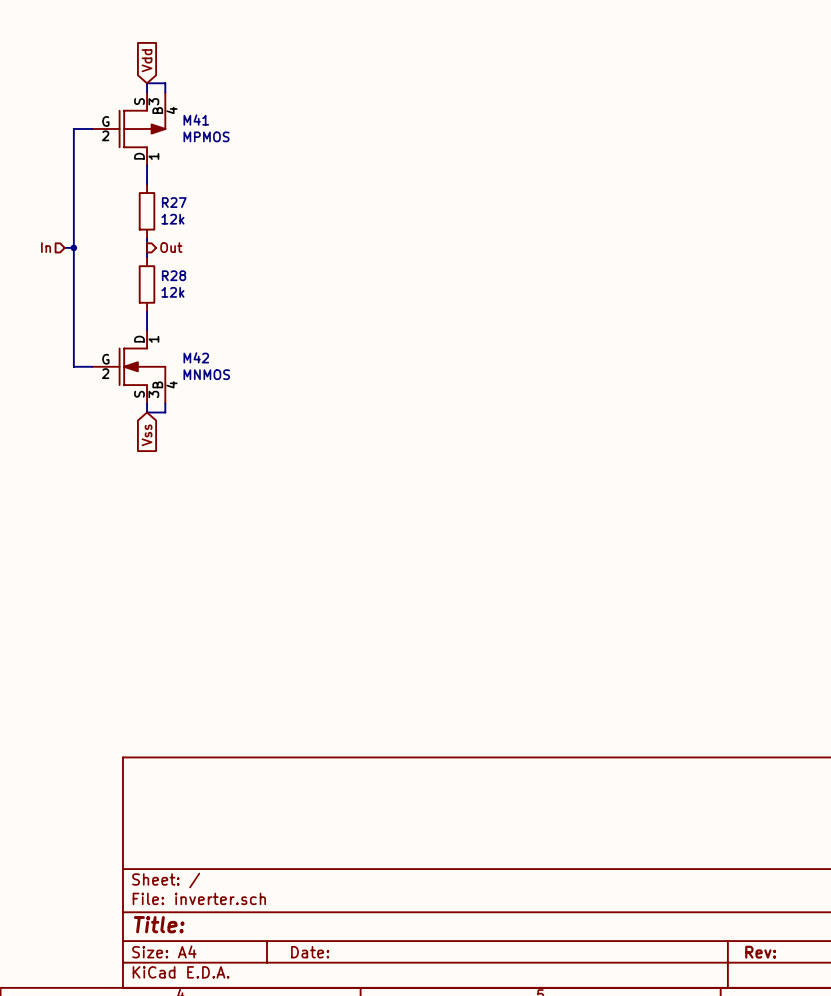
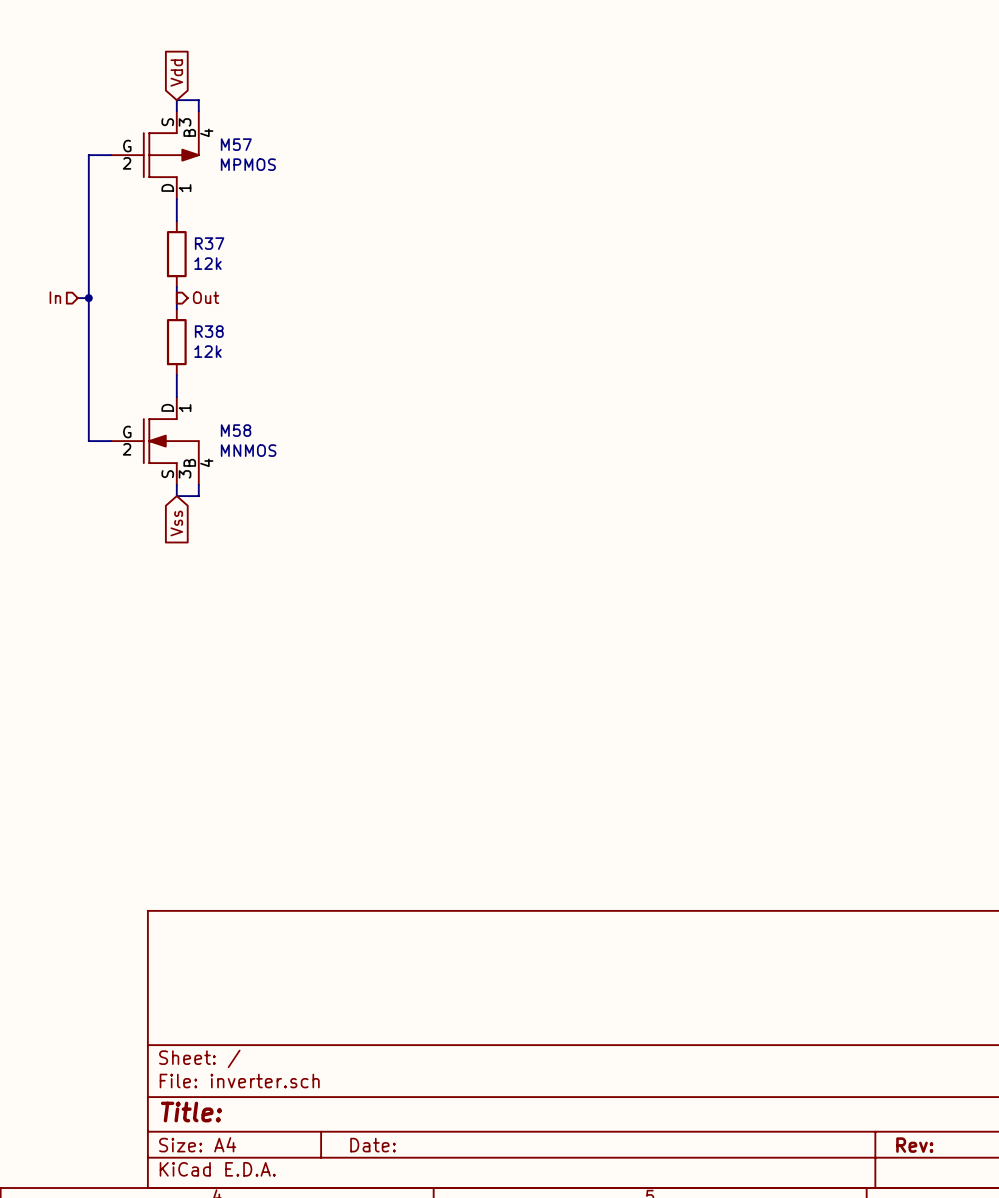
M41 name: M41 (196, 120) -> M57 (236, 144)
R27 name: R27 (174, 202) -> R37 (209, 243)
R28 name: R28 (174, 275) -> R38 (209, 331)
M42 name: M42 (196, 357) -> M58 (236, 430)

